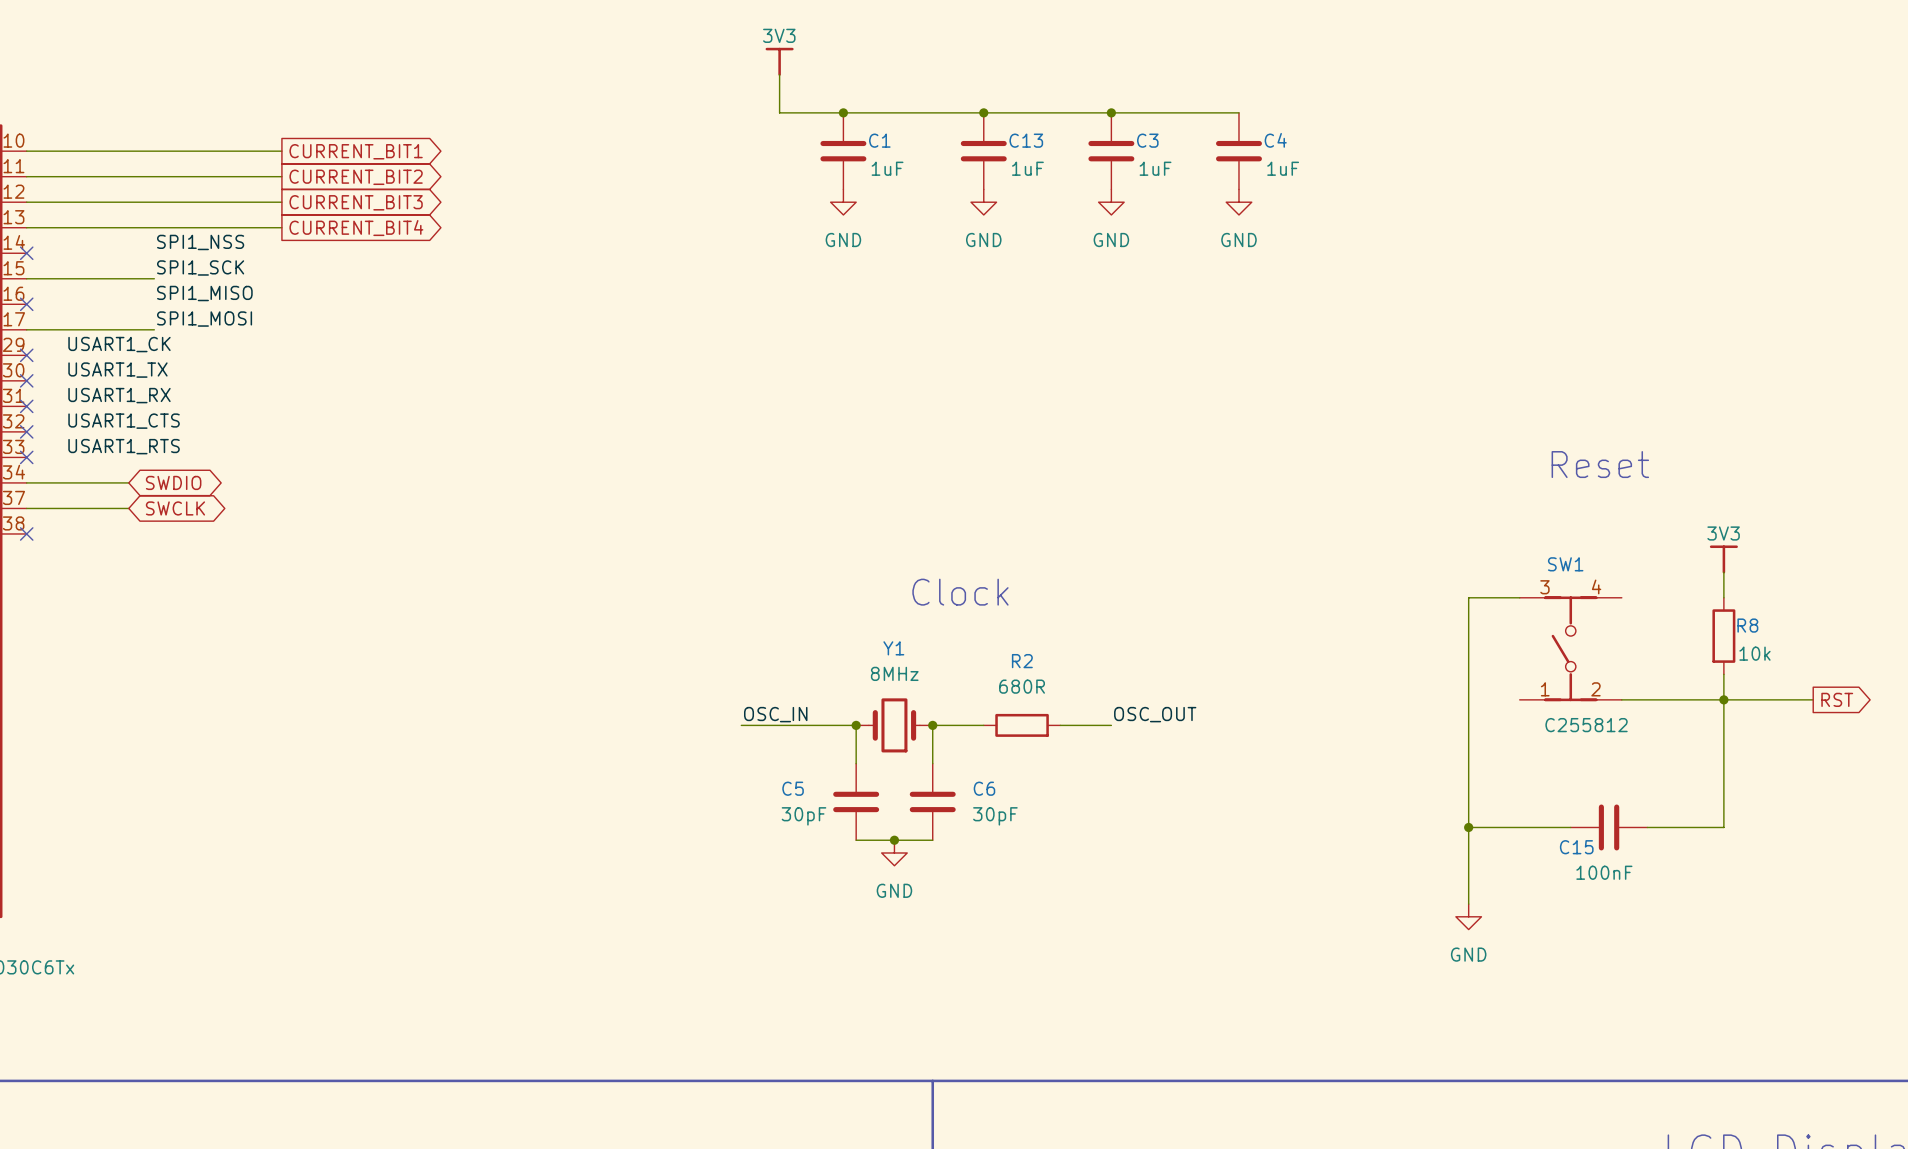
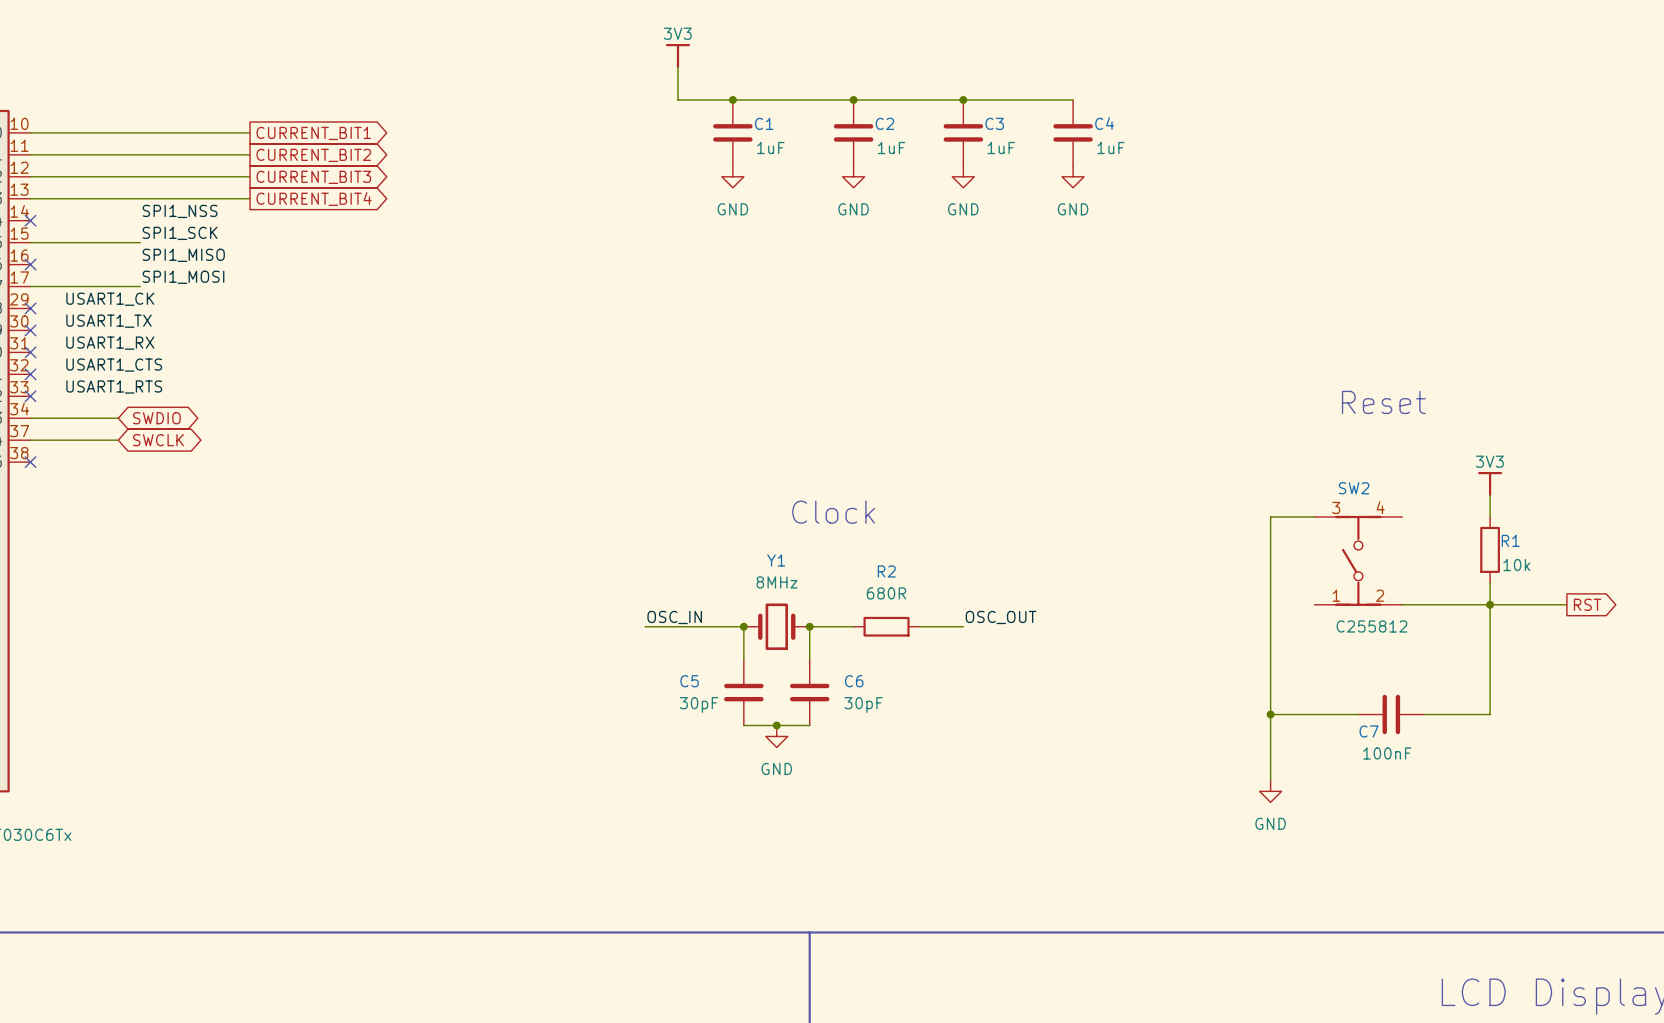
C13 name: C13 (1026, 140) -> C2 (884, 123)
SW1 name: SW1 (1565, 564) -> SW2 (1354, 488)
R8 name: R8 (1747, 625) -> R1 (1510, 540)
C15 name: C15 (1576, 847) -> C7 (1369, 731)

